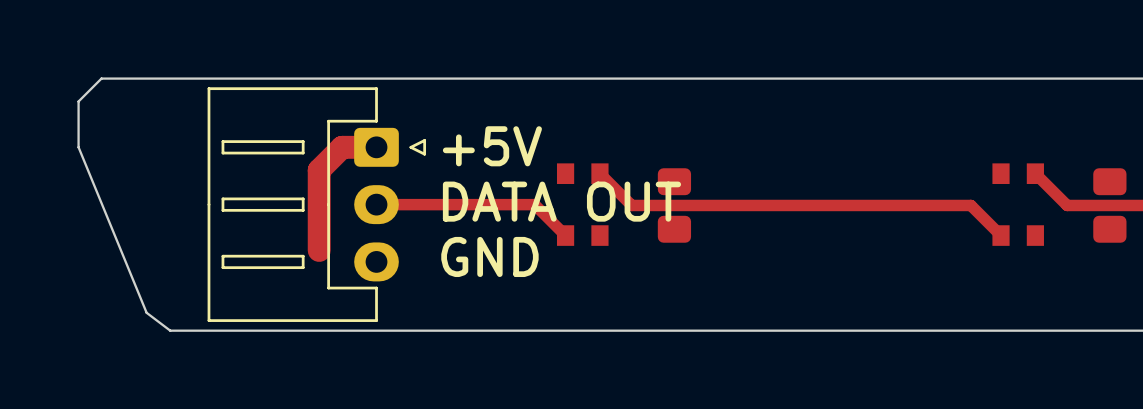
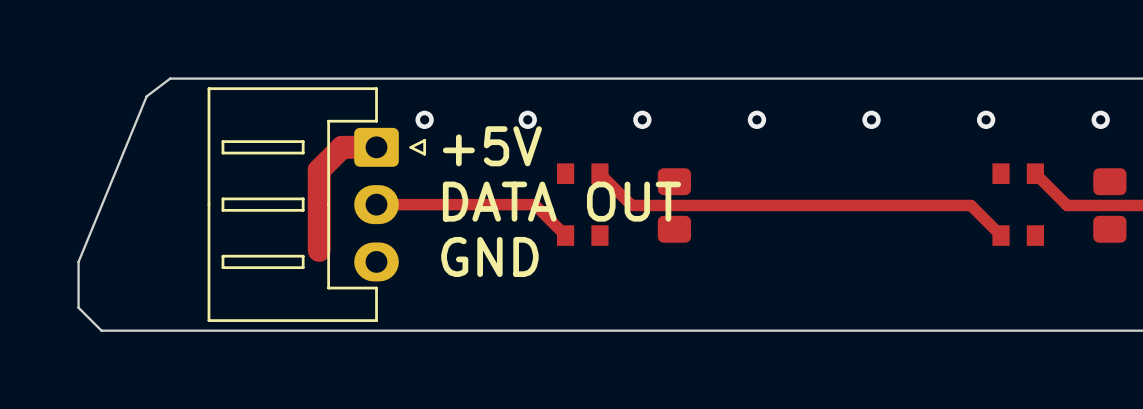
board edge: (170, 78) (101, 78) (78, 101) (78, 147) (146, 312) (170, 330) -> (170, 78) (146, 96) (78, 261) (78, 307) (101, 330) (170, 330)
via: none -> (424, 119)
via: none -> (527, 119)
via: none -> (642, 119)
via: none -> (756, 119)
via: none -> (871, 119)
via: none -> (986, 119)
via: none -> (1100, 119)

